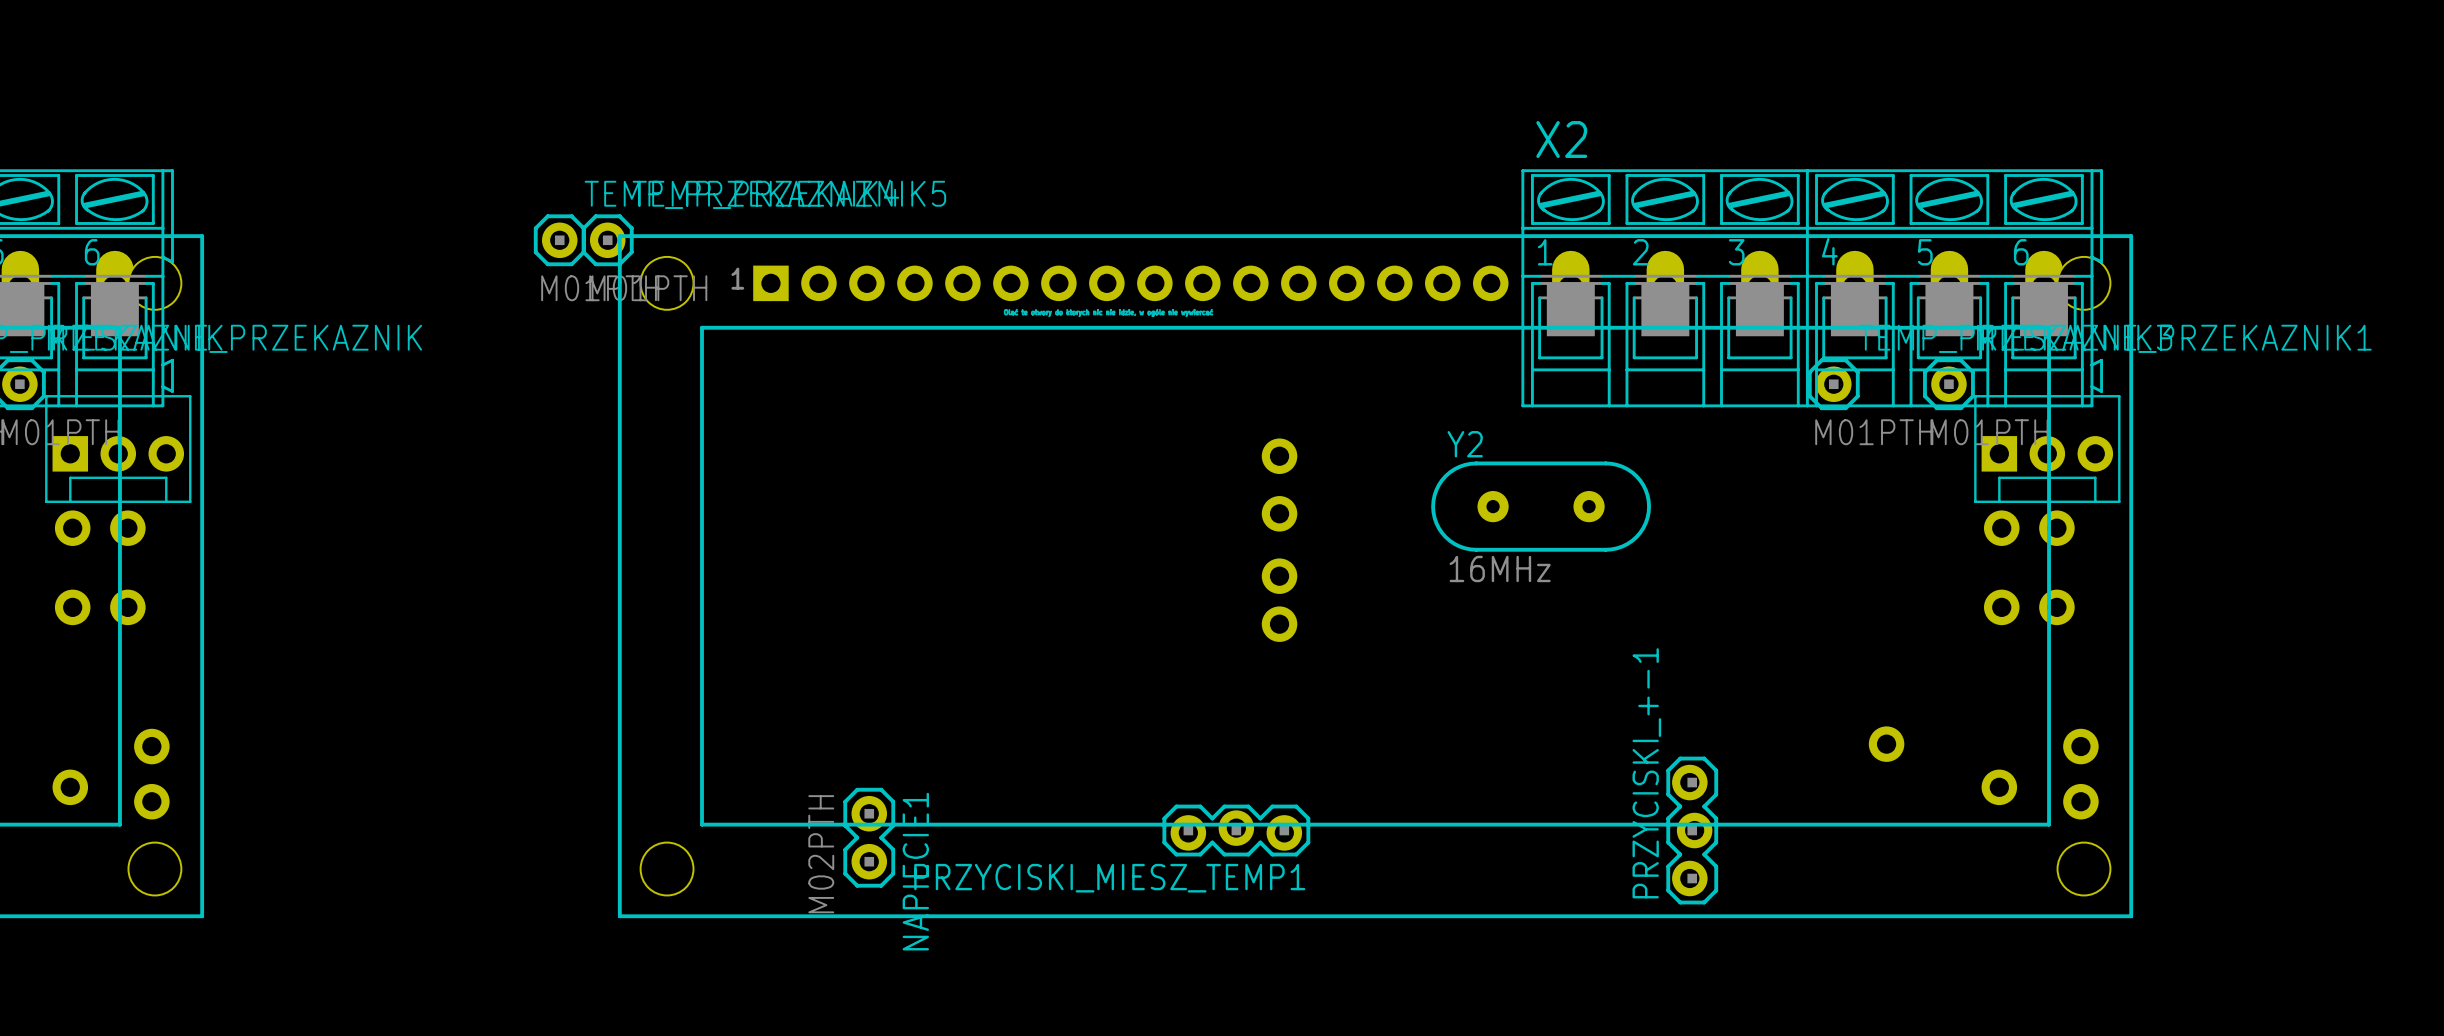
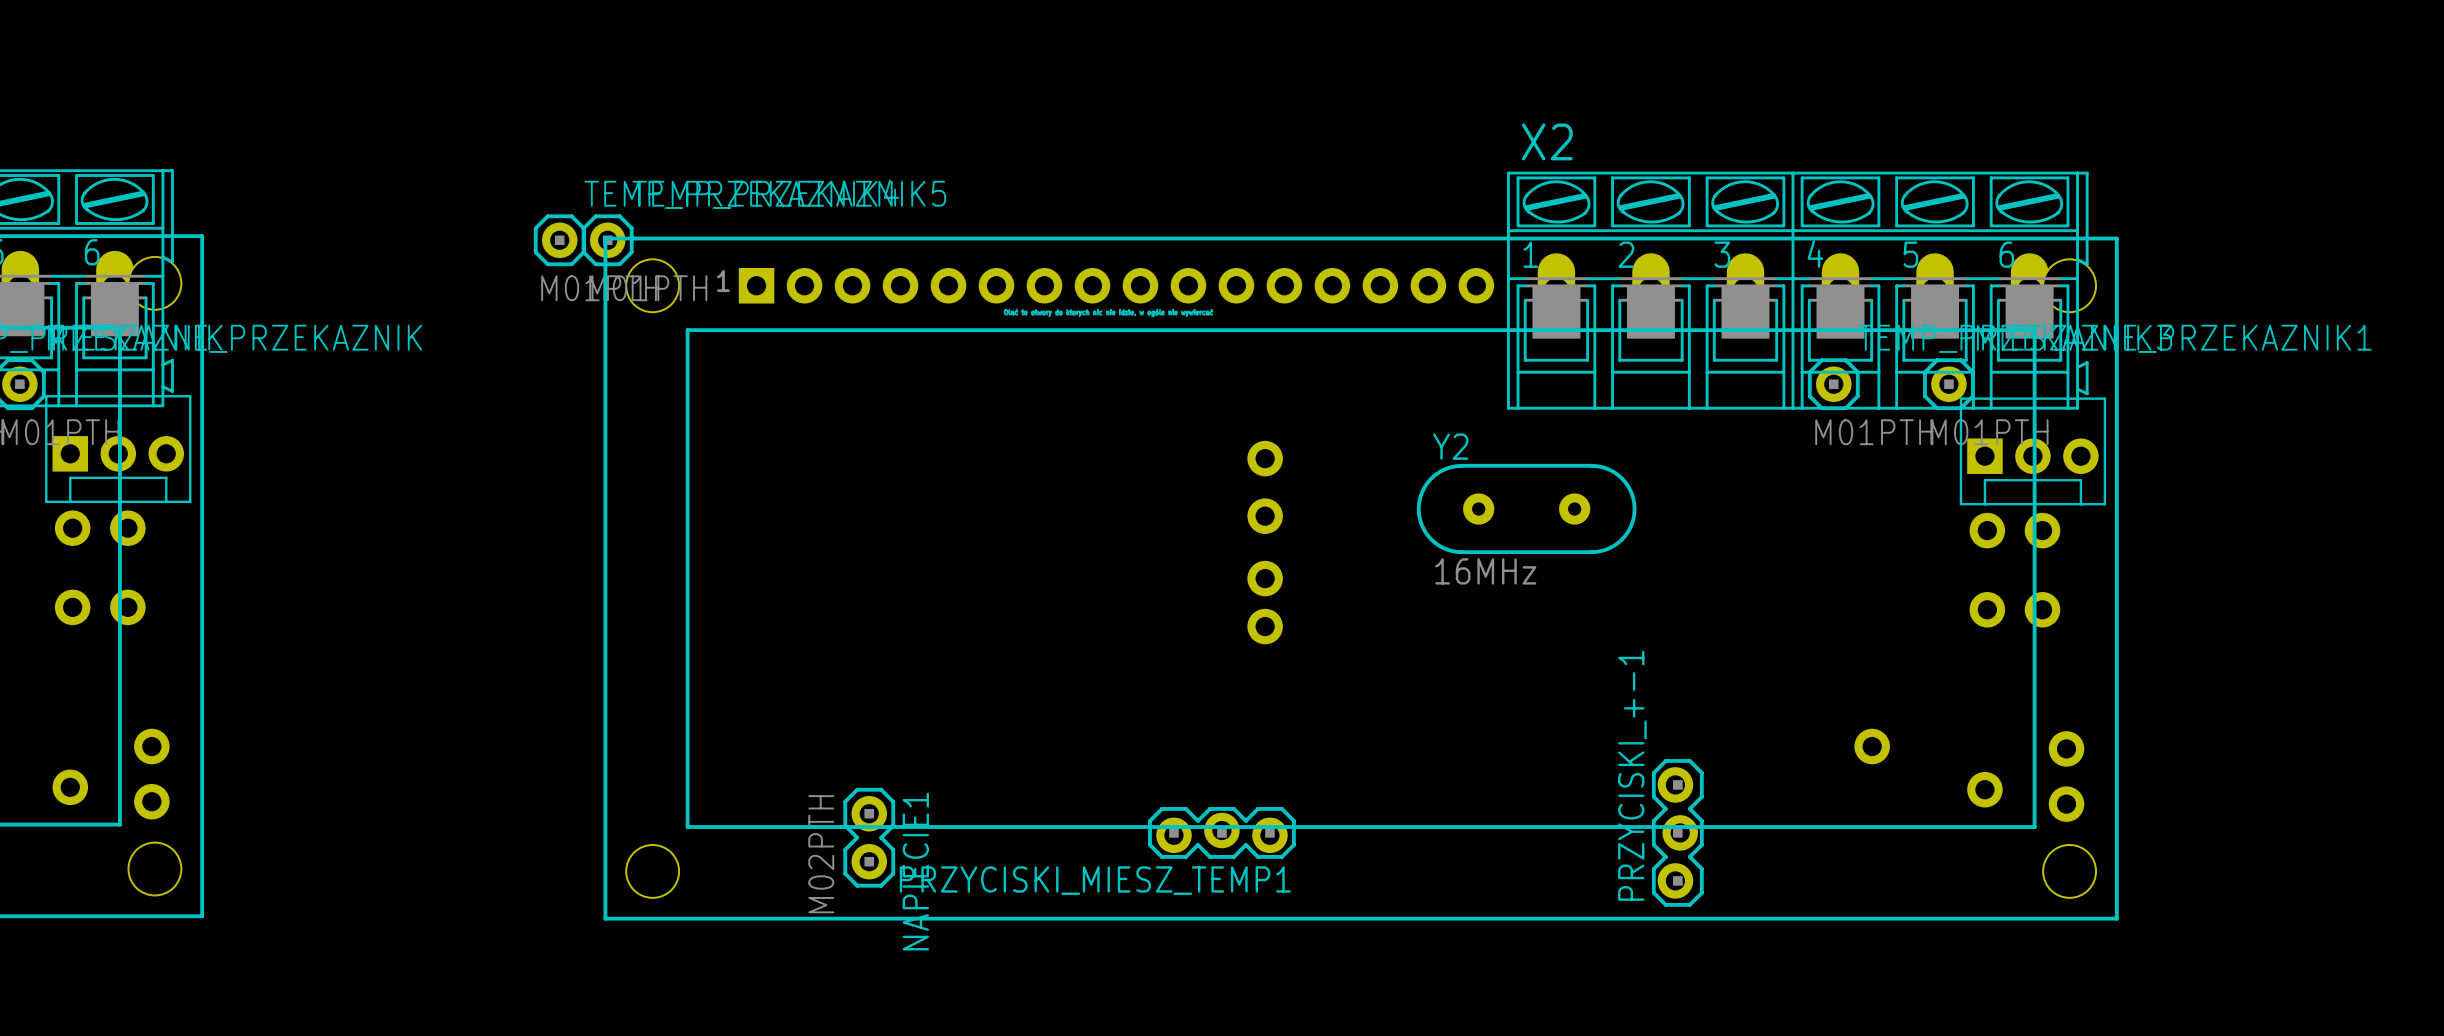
X2 position: (1812, 288) -> (1797, 290)
part position: (2047, 449) -> (2032, 451)
part position: (1279, 456) -> (1265, 458)
Y2 position: (1541, 506) -> (1526, 509)
part position: (1279, 513) -> (1265, 516)
part position: (2001, 528) -> (1987, 530)
part position: (2056, 528) -> (2042, 530)
part position: (1279, 576) -> (1265, 578)
part position: (1375, 576) -> (1361, 578)
part position: (2001, 607) -> (1987, 609)
part position: (2056, 607) -> (2042, 609)
part position: (1279, 624) -> (1265, 626)
part position: (1886, 744) -> (1872, 746)
part position: (2080, 746) -> (2066, 748)
part position: (1999, 787) -> (1984, 789)
part position: (2080, 801) -> (2066, 804)
PRZYCISKI_MIESZ_TEMP1 position: (1236, 830) -> (1221, 832)
PRZYCISKI_+-1 position: (1692, 830) -> (1677, 832)

